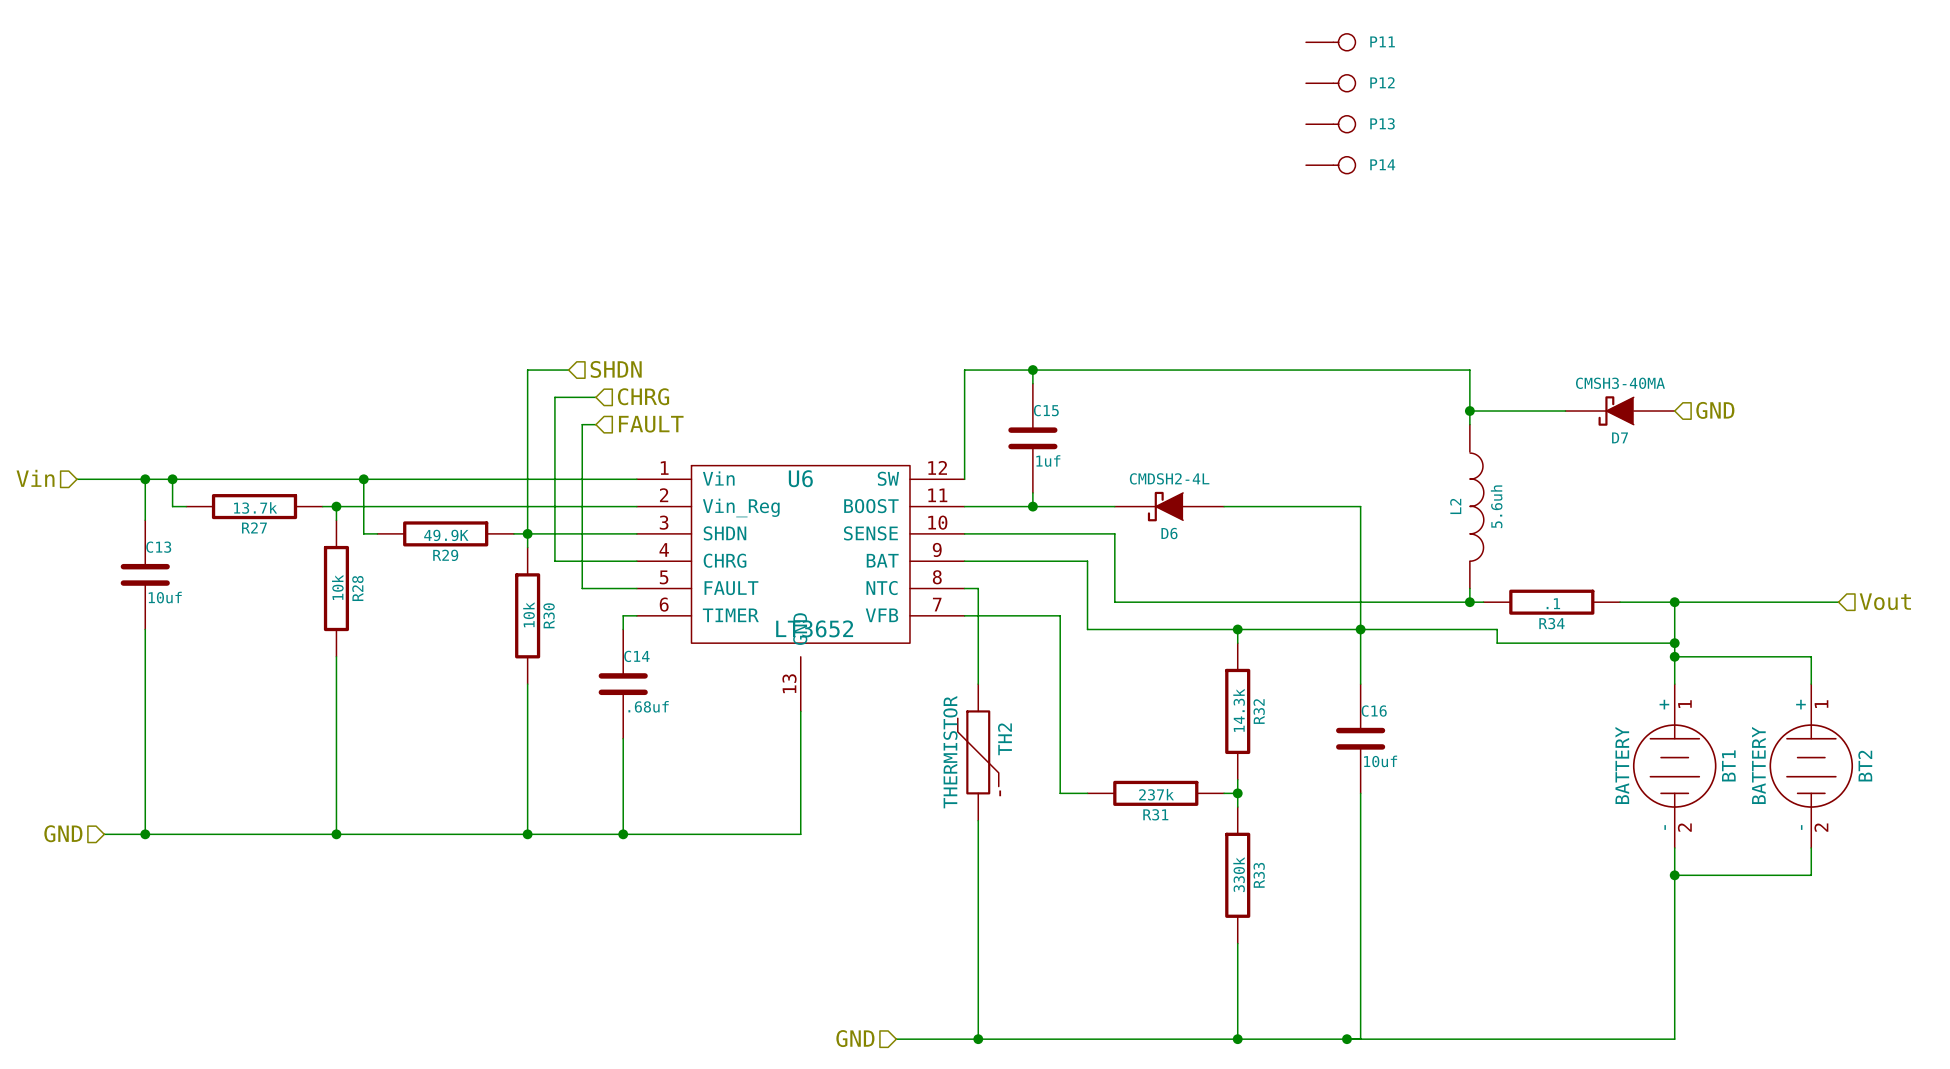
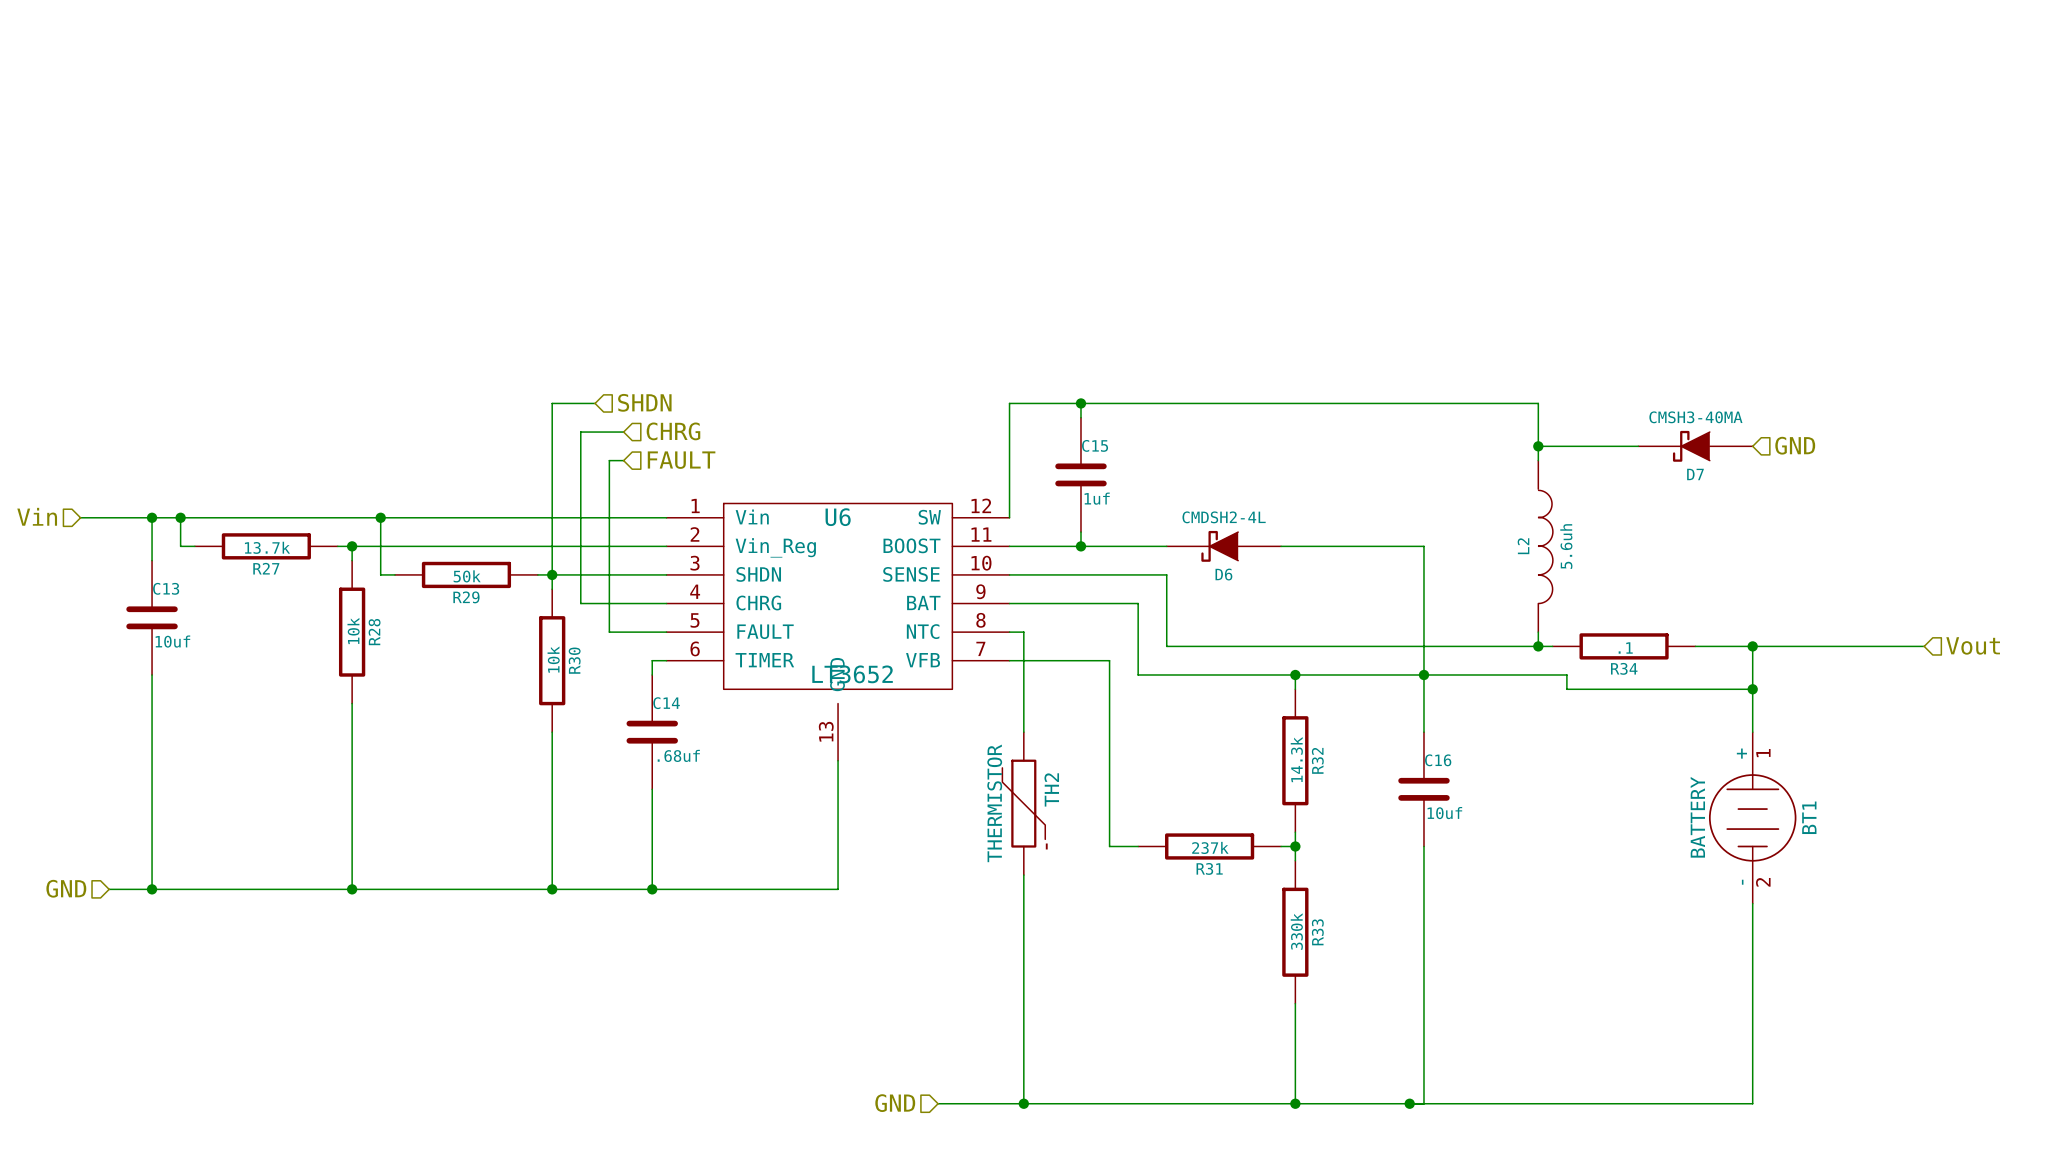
P11: (1330, 42) -> none
P12: (1330, 83) -> none
P13: (1330, 124) -> none
P14: (1330, 165) -> none
R29 value: 49.9K (446, 535) -> 50k (467, 576)
wire: (1674, 656) (1811, 656) (1811, 684) -> none
junction: (1674, 656) -> none
BT2: BATTERY (1811, 766) -> none
wire: (1811, 847) (1811, 875) (1674, 875) -> none
junction: (1674, 875) -> none

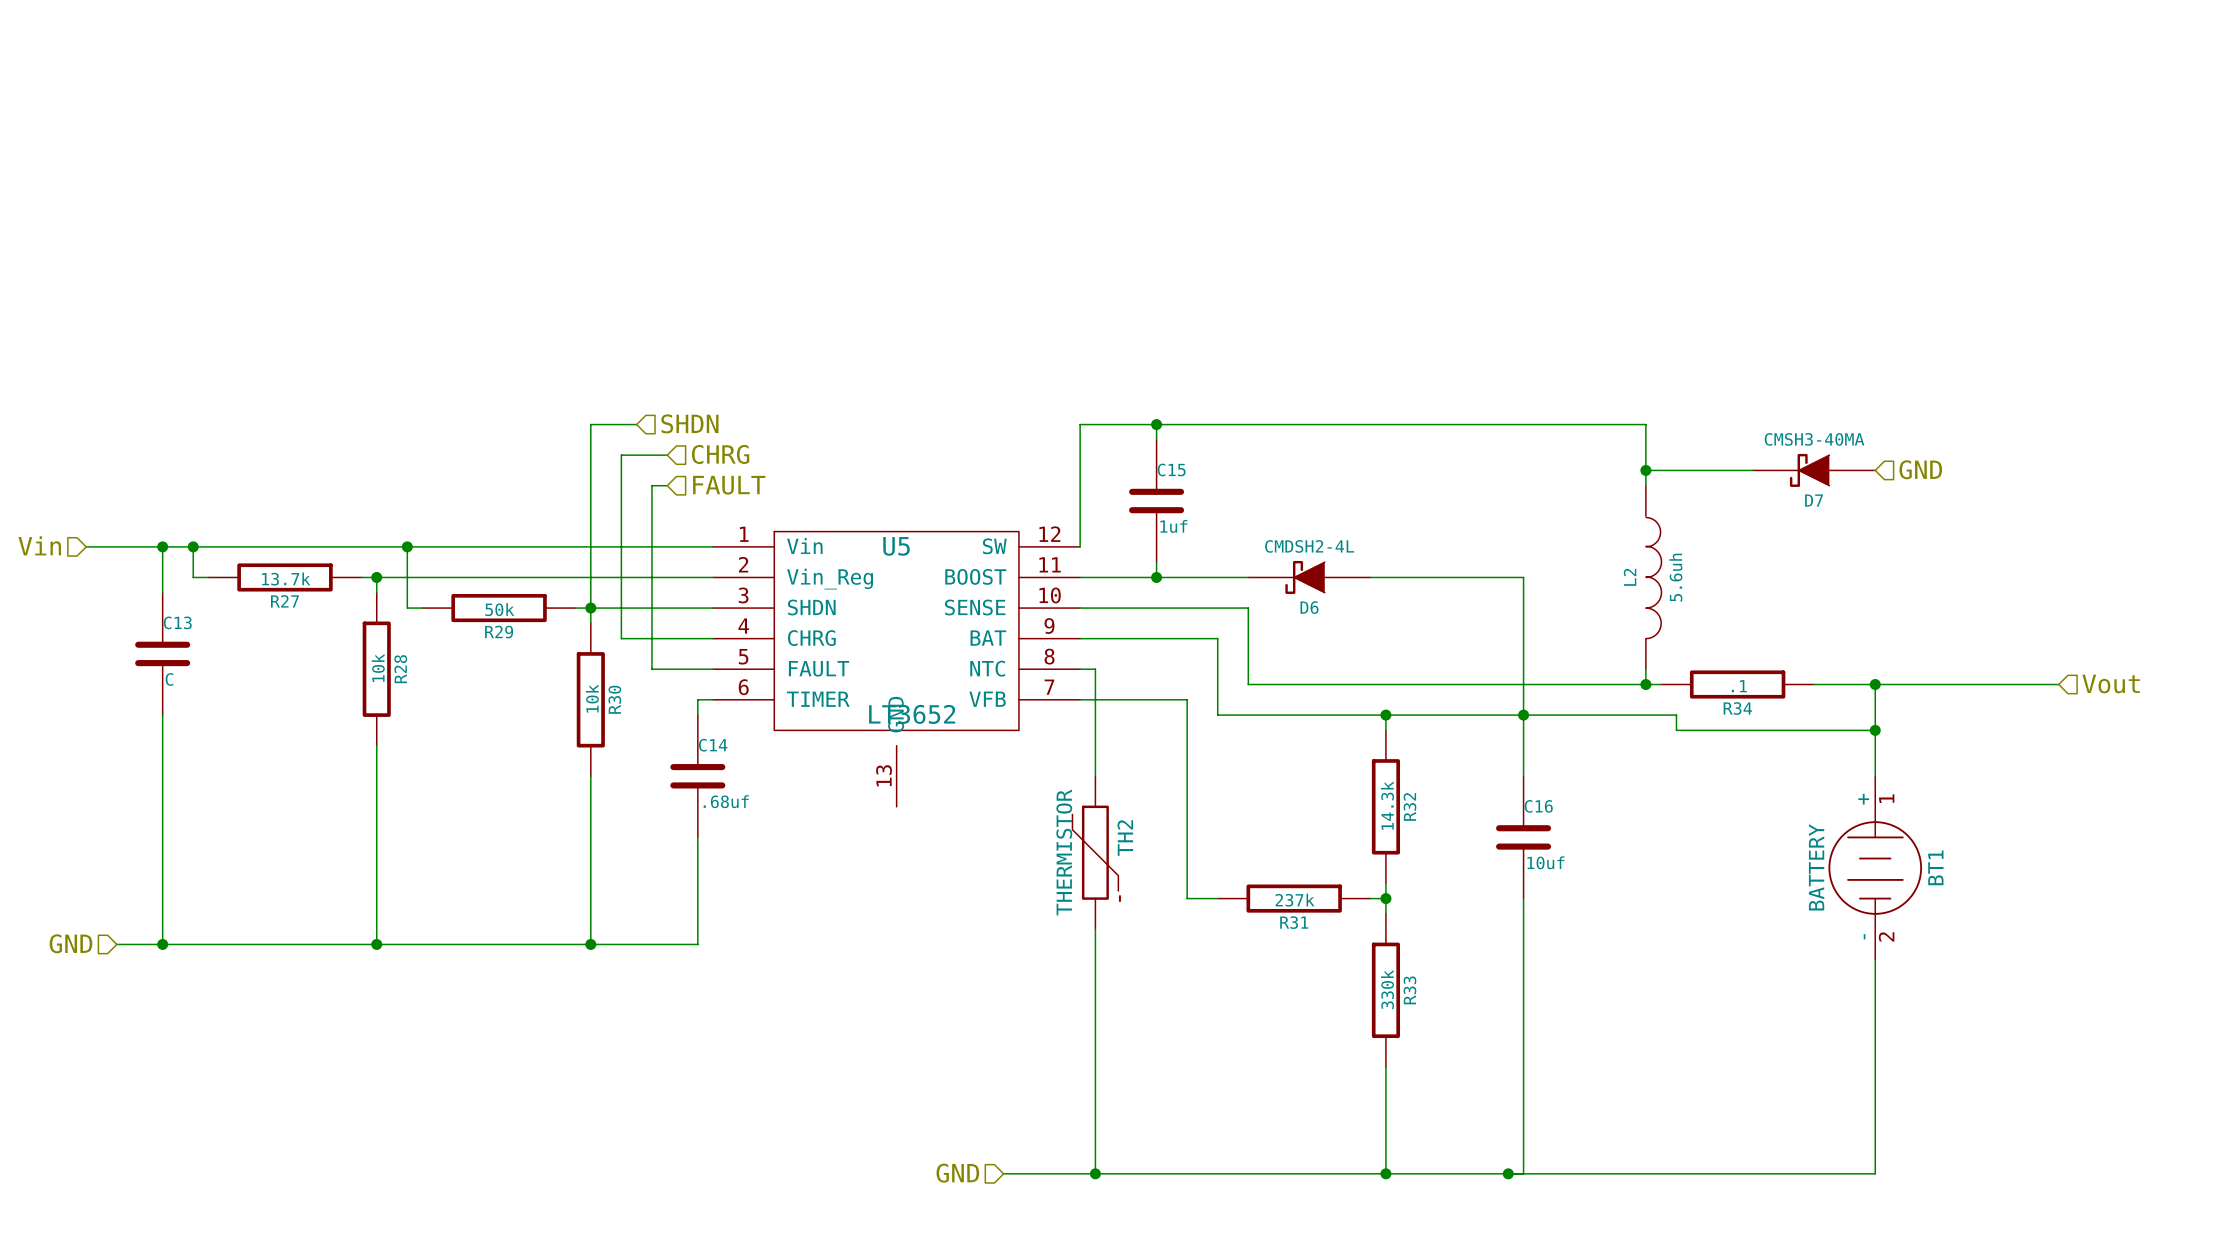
U6 name: U6 (838, 517) -> U5 (896, 546)
C13 value: 10uf (172, 641) -> C (169, 679)
wire: (838, 760) (838, 889) (652, 889) -> none
junction: (652, 889) -> none

